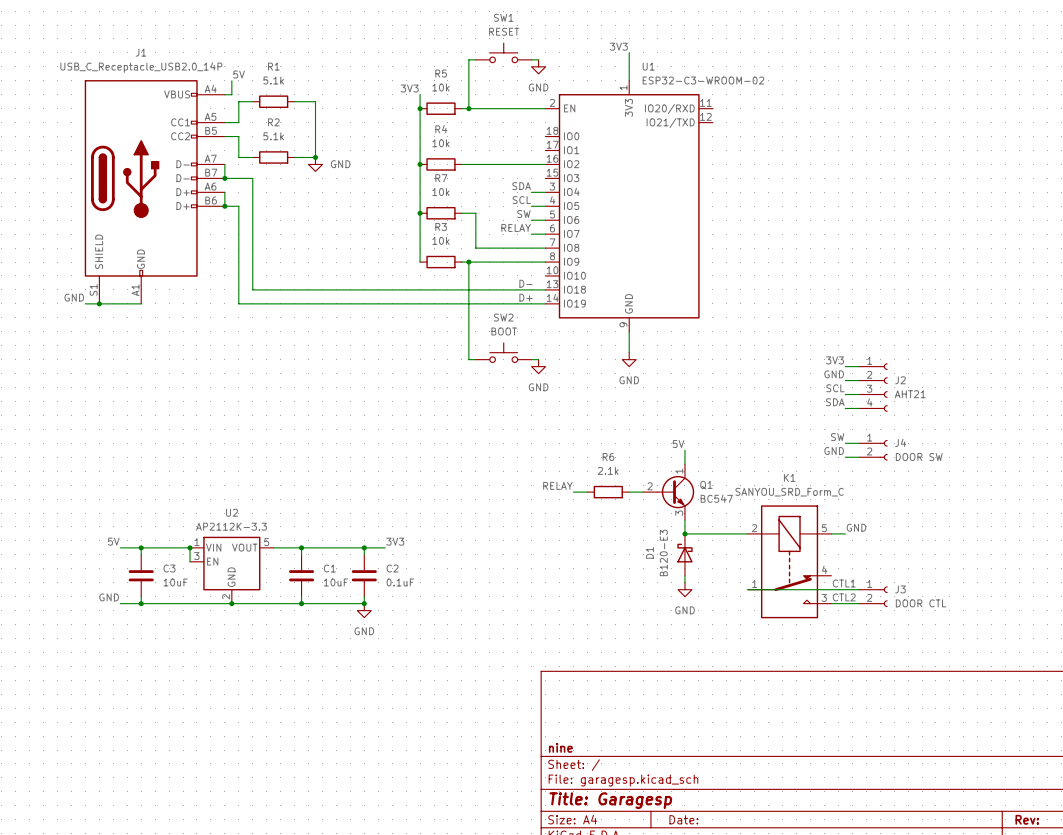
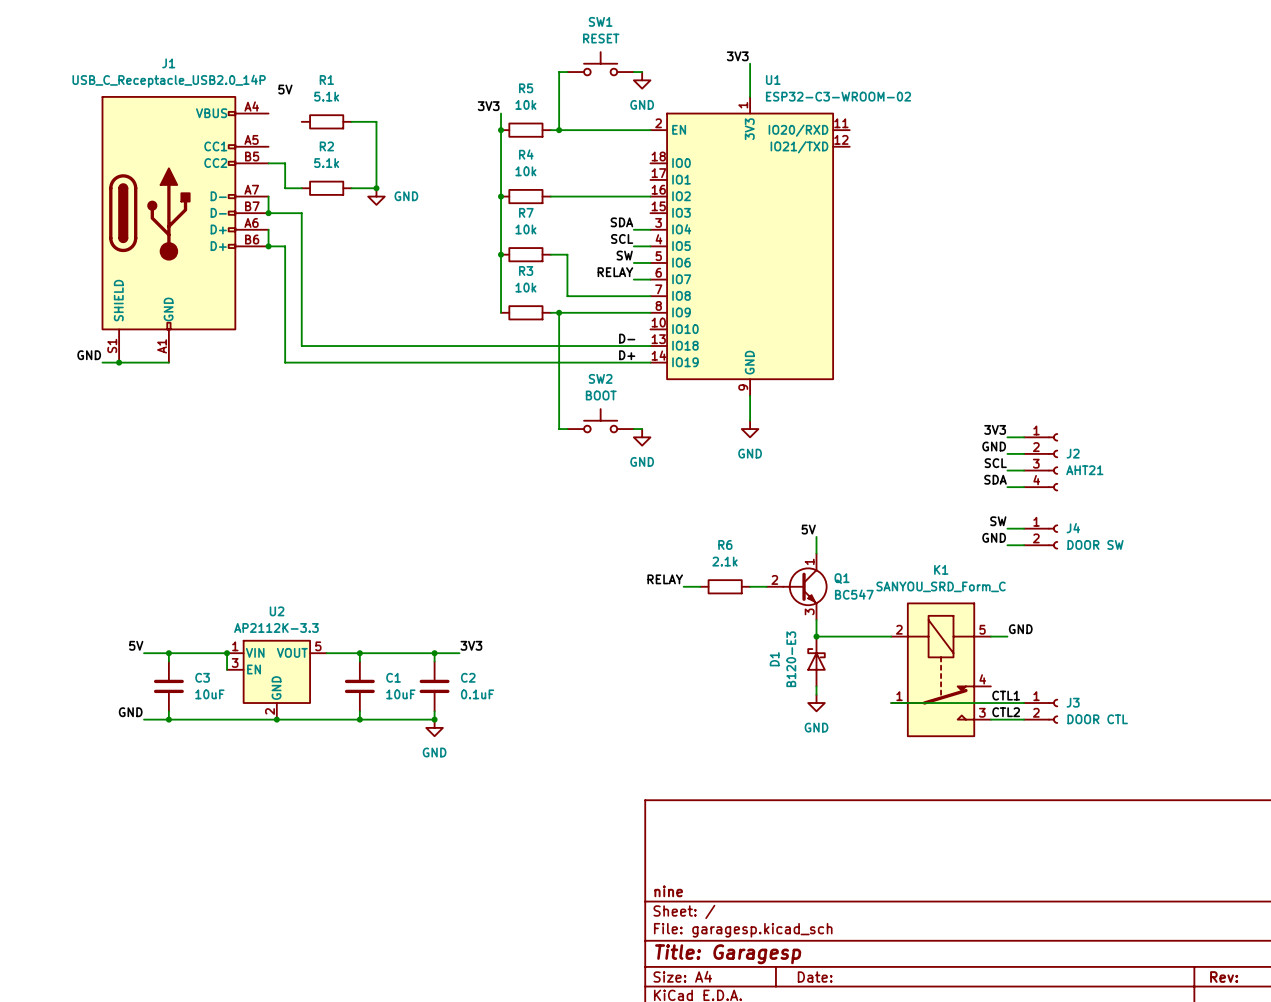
wire: (231, 80) (231, 94) (224, 94) -> none
wire: (252, 101) (238, 101) (238, 122) (224, 122) -> none

